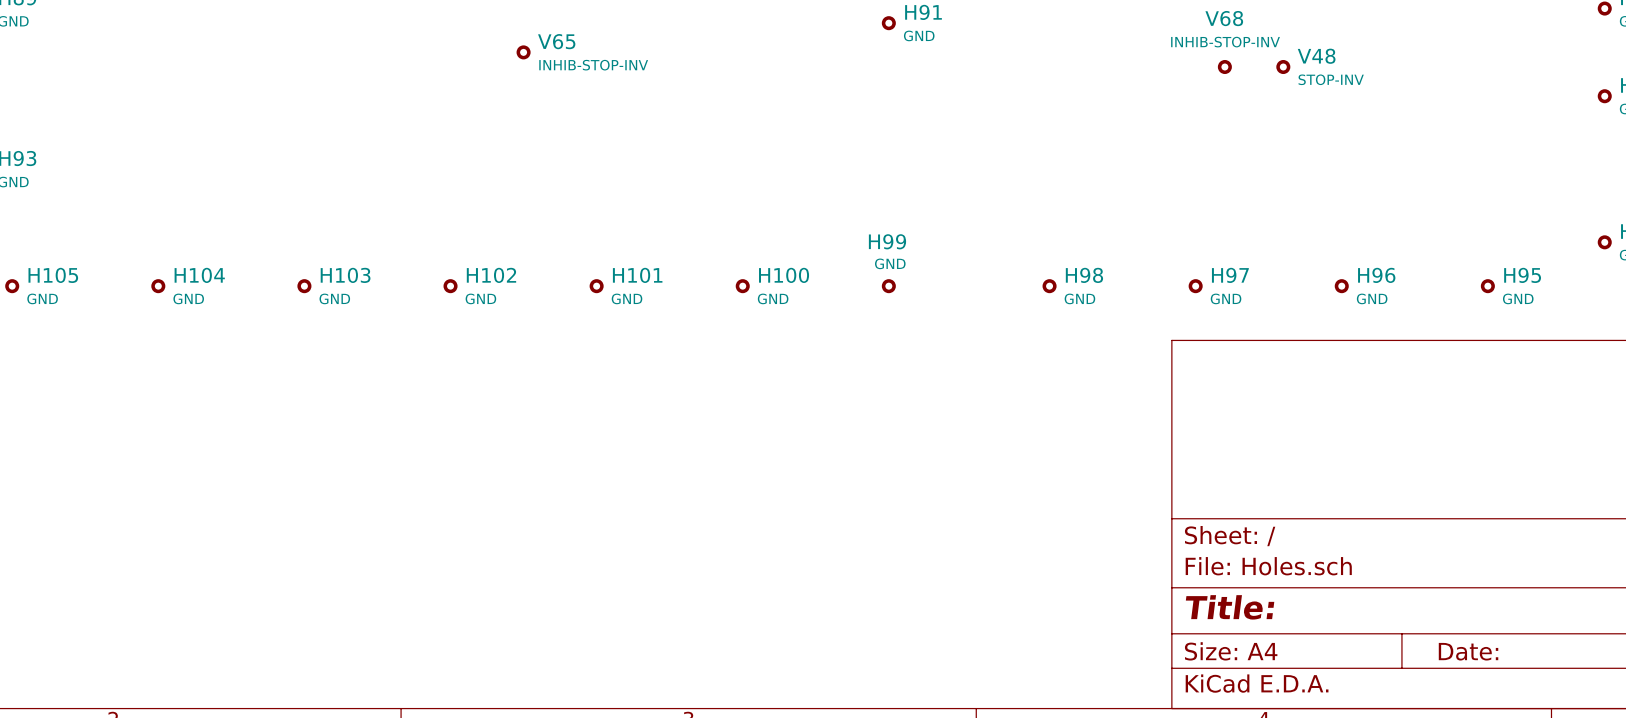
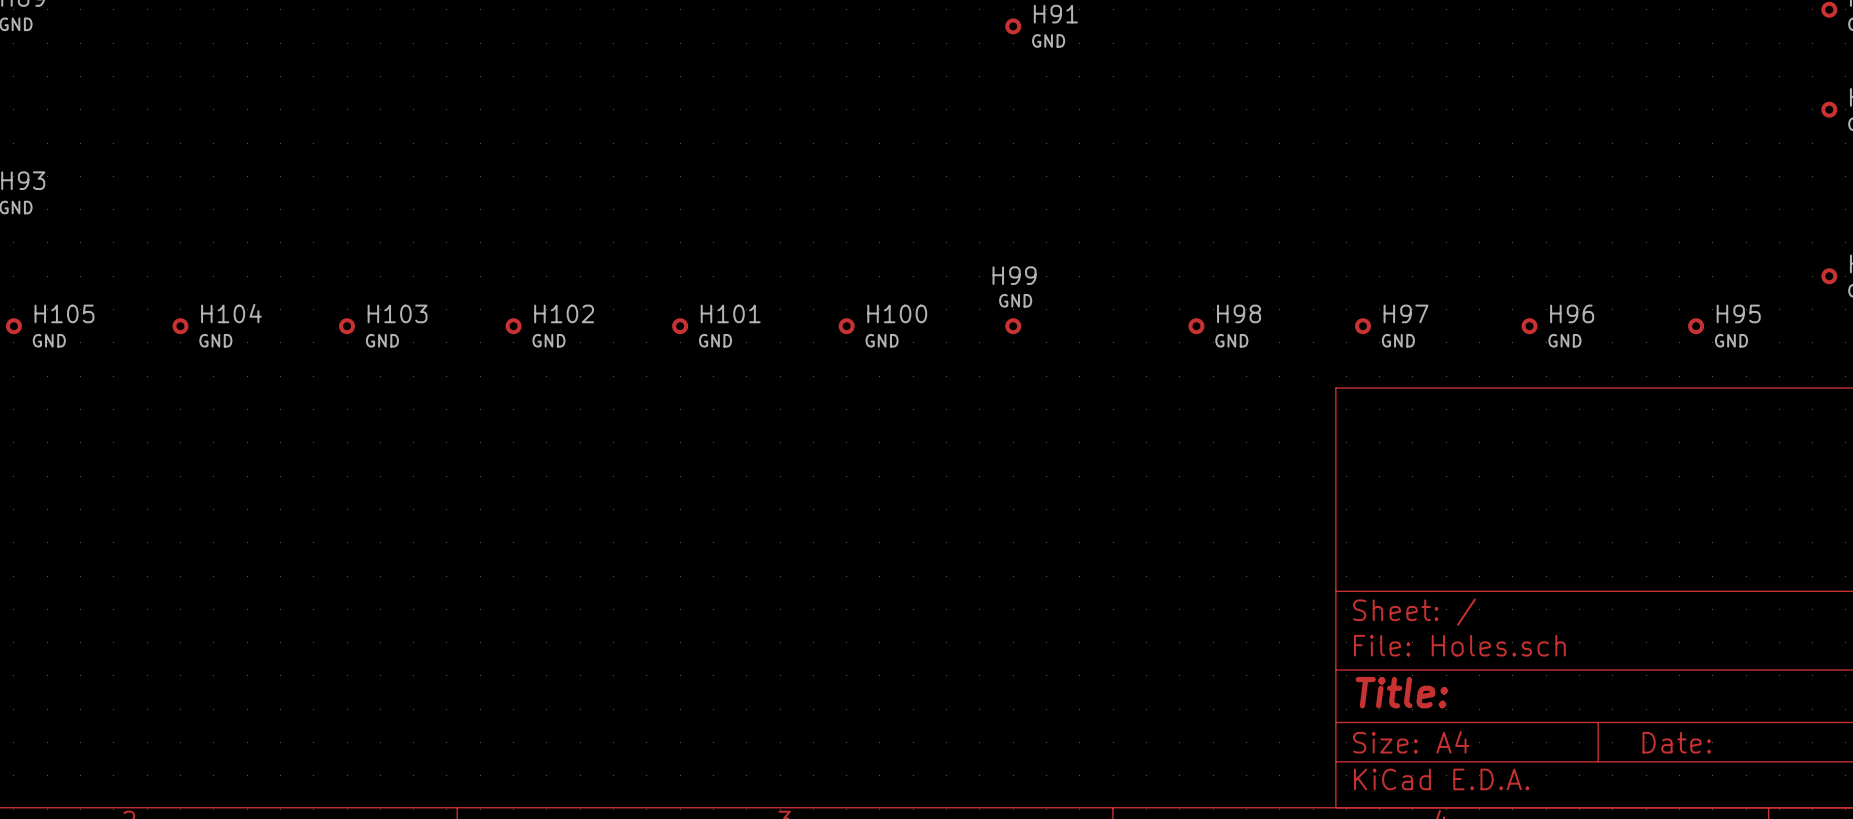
V65: INHIB-STOP-INV (523, 52) -> none
V68: INHIB-STOP-INV (1224, 67) -> none
V48: STOP-INV (1283, 67) -> none

